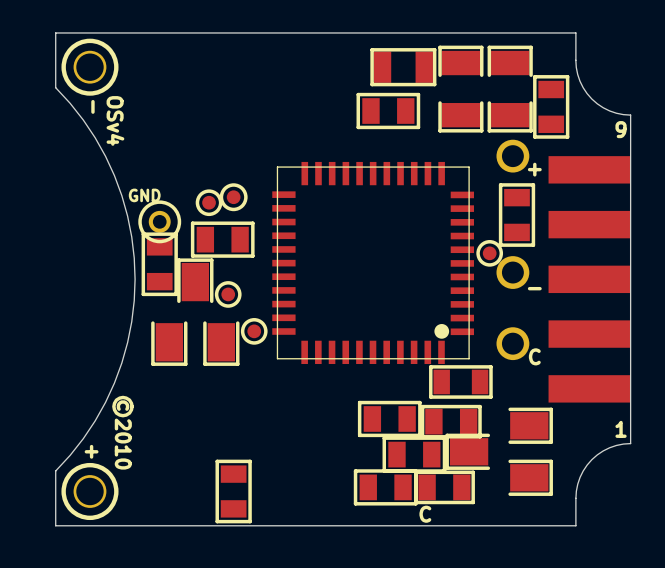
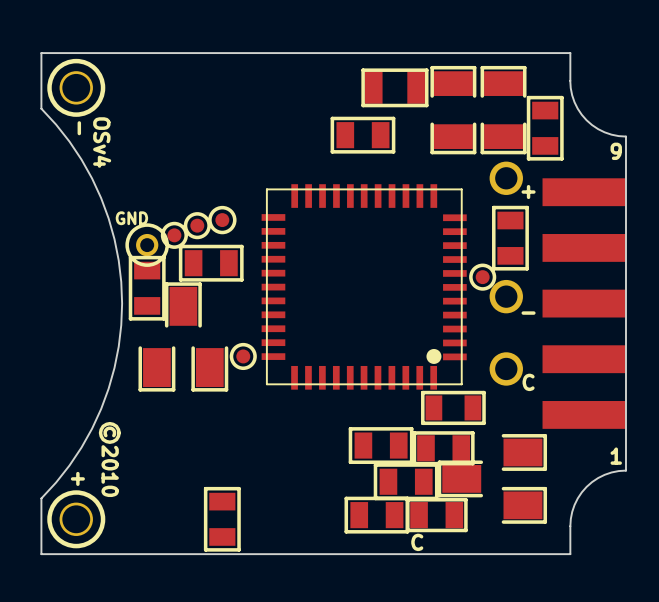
part position: (388, 111) -> (362, 135)
part position: (228, 294) -> (174, 235)

